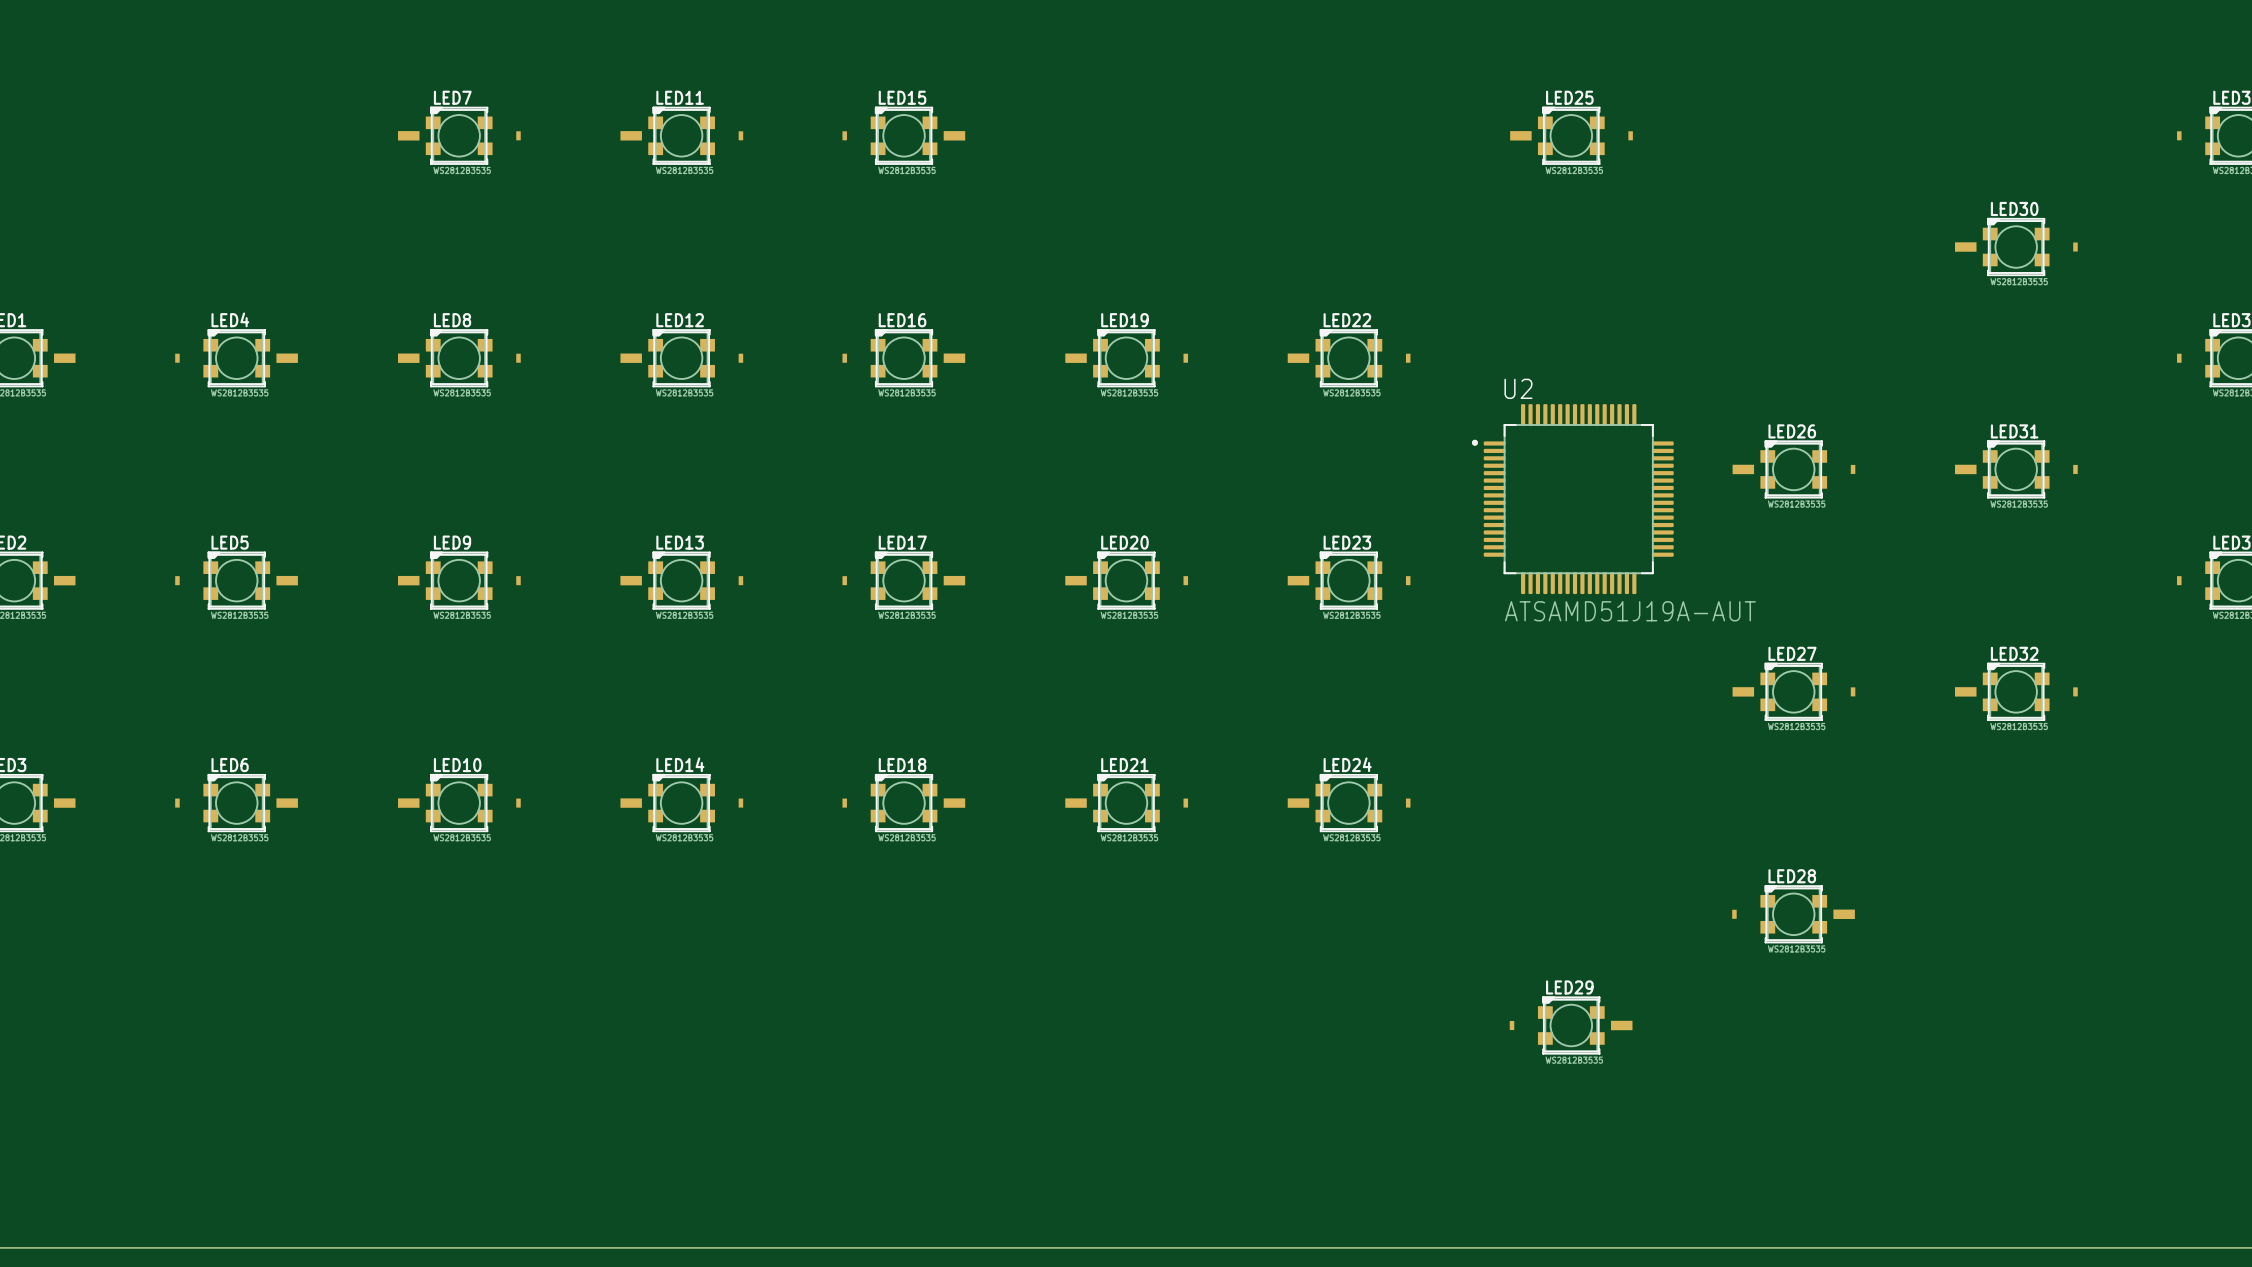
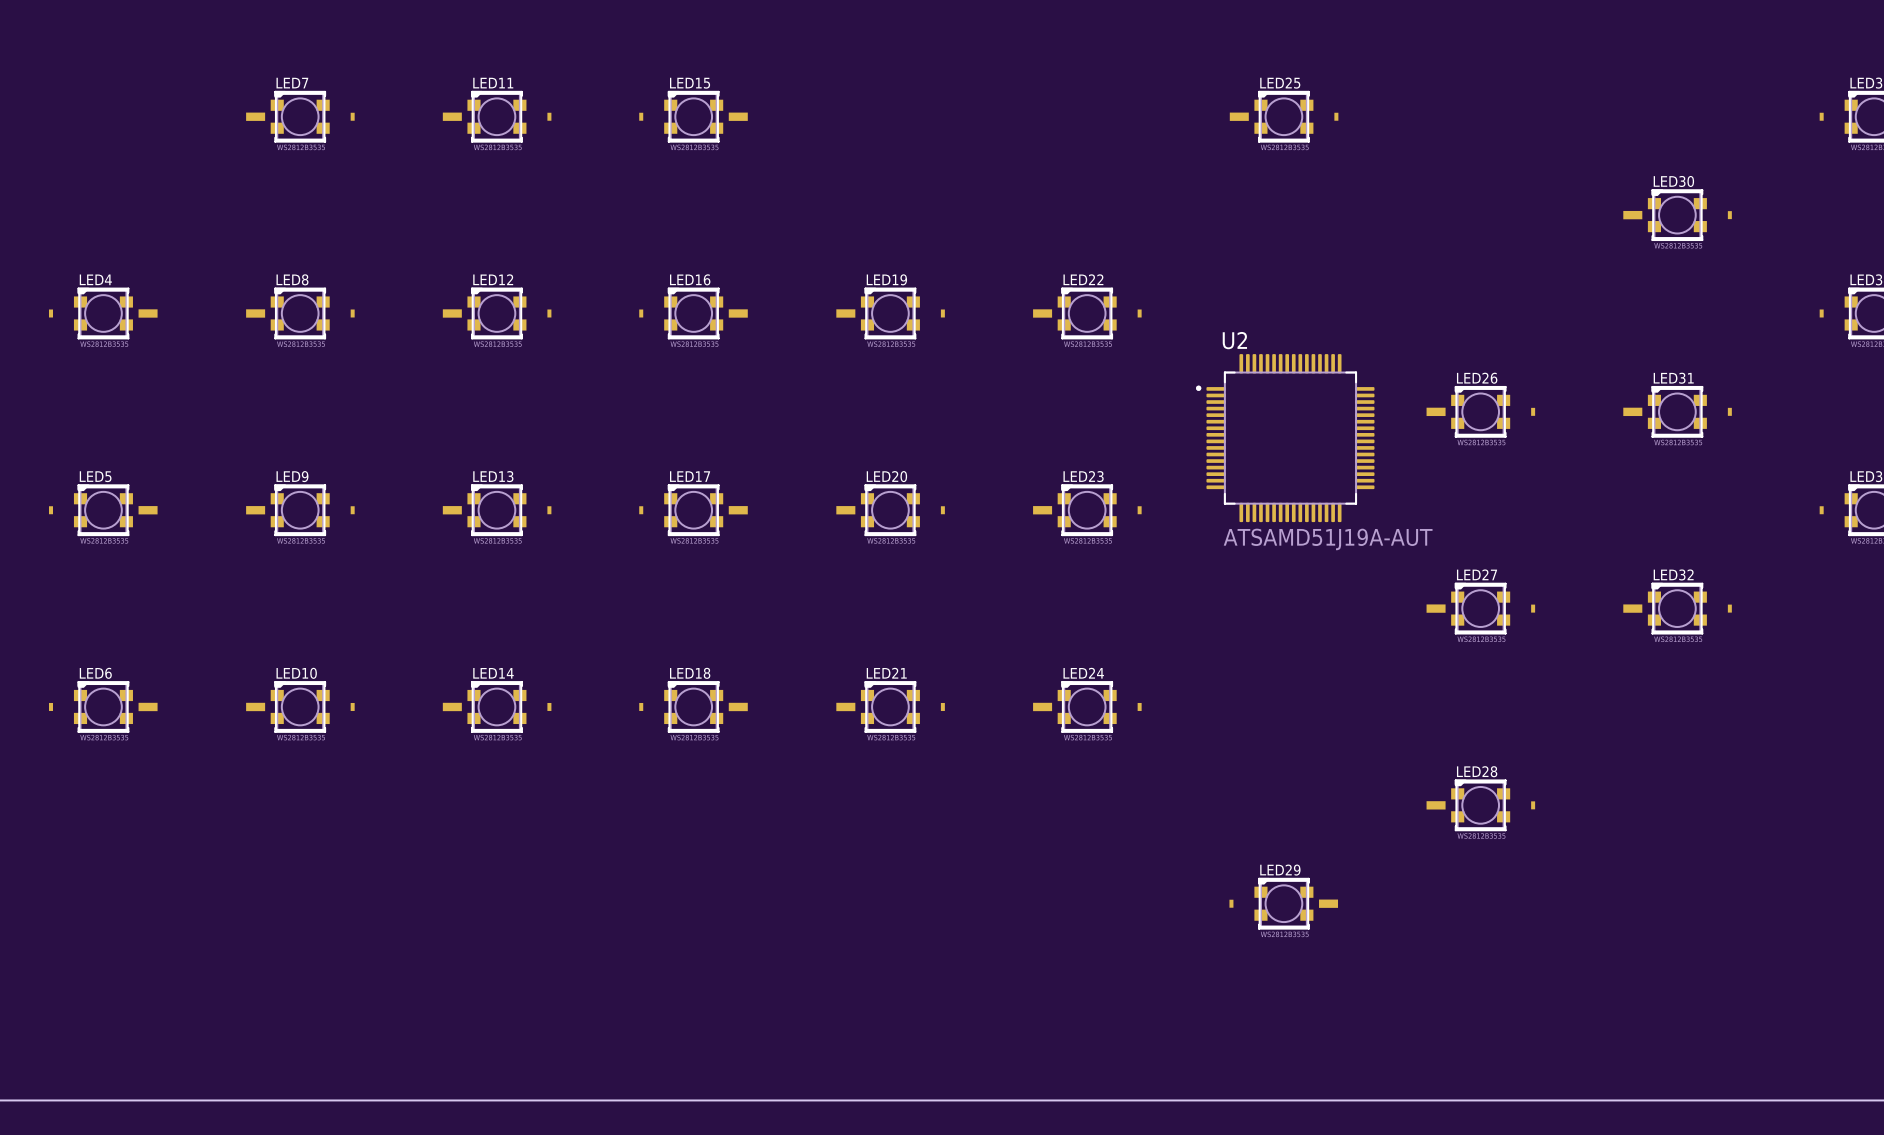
part rotation: 0° (1793, 914) -> 180° (1480, 805)

